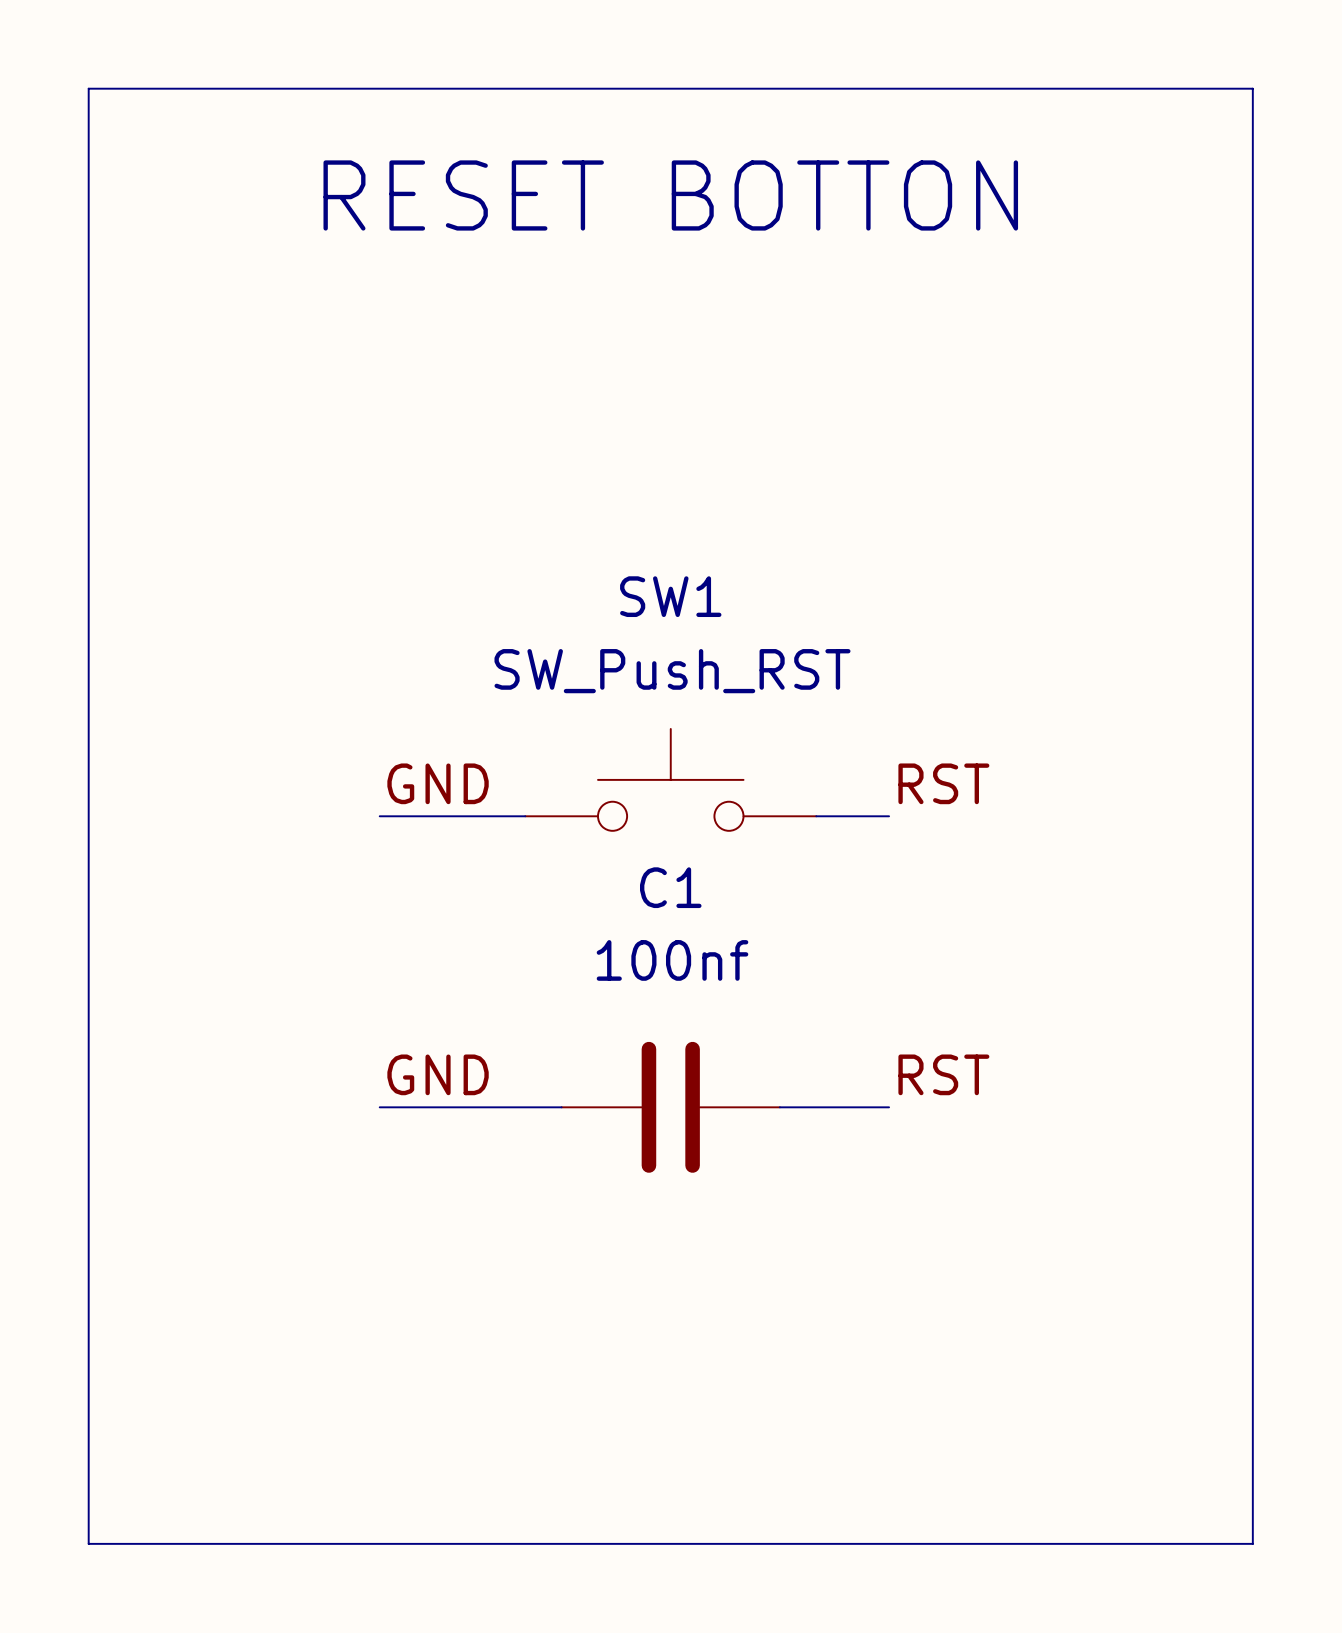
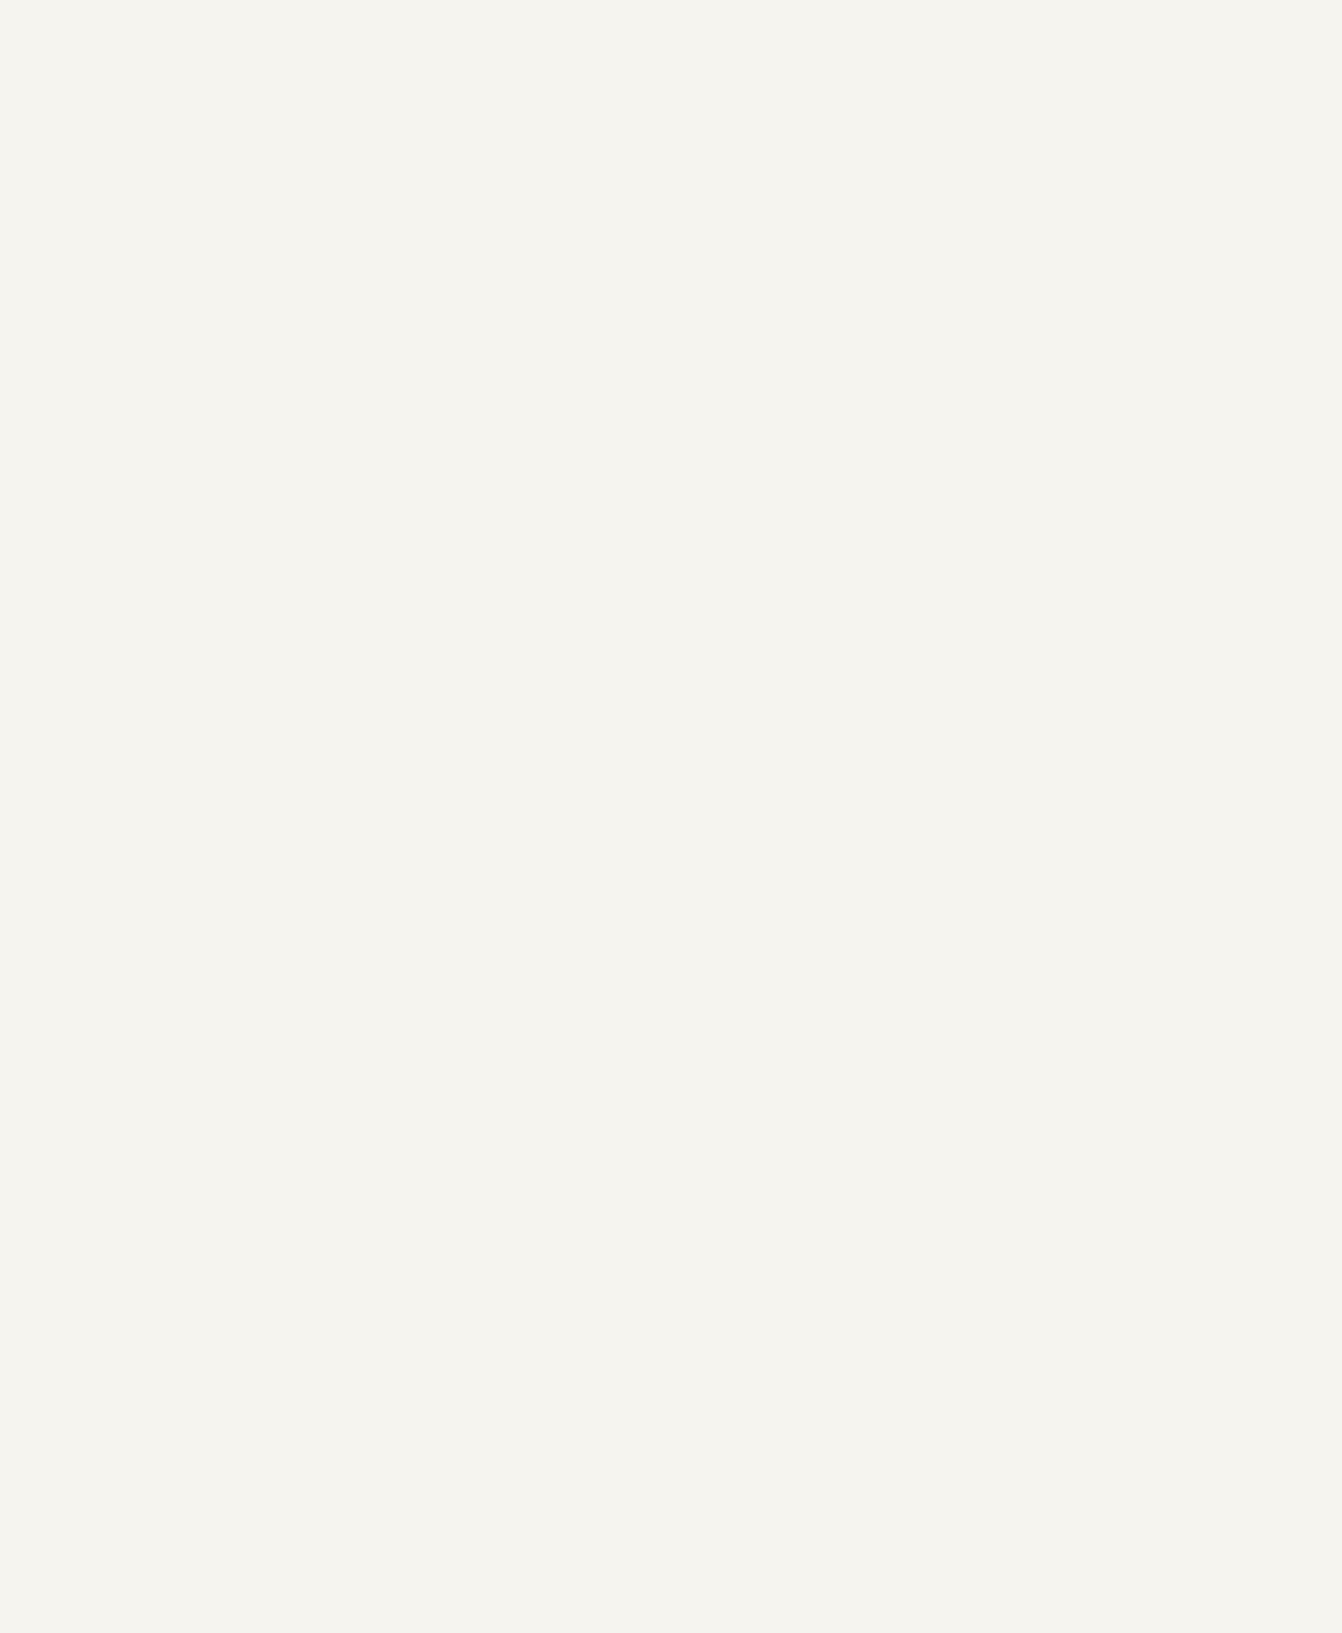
bus: (88, 88) (88, 1543) (1252, 1543) (1252, 88) (88, 88) -> none
text: RESET BOTTON (670, 195) -> none
SW1: SW_Push_RST (670, 779) -> none
label: GND (438, 783) -> none
label: RST (943, 783) -> none
wire: (379, 816) (525, 816) -> none
wire: (816, 816) (889, 816) -> none
label: GND (438, 1074) -> none
label: RST (943, 1074) -> none
wire: (379, 1107) (561, 1107) -> none
C1: 100nf (670, 1107) -> none
wire: (779, 1107) (889, 1107) -> none

